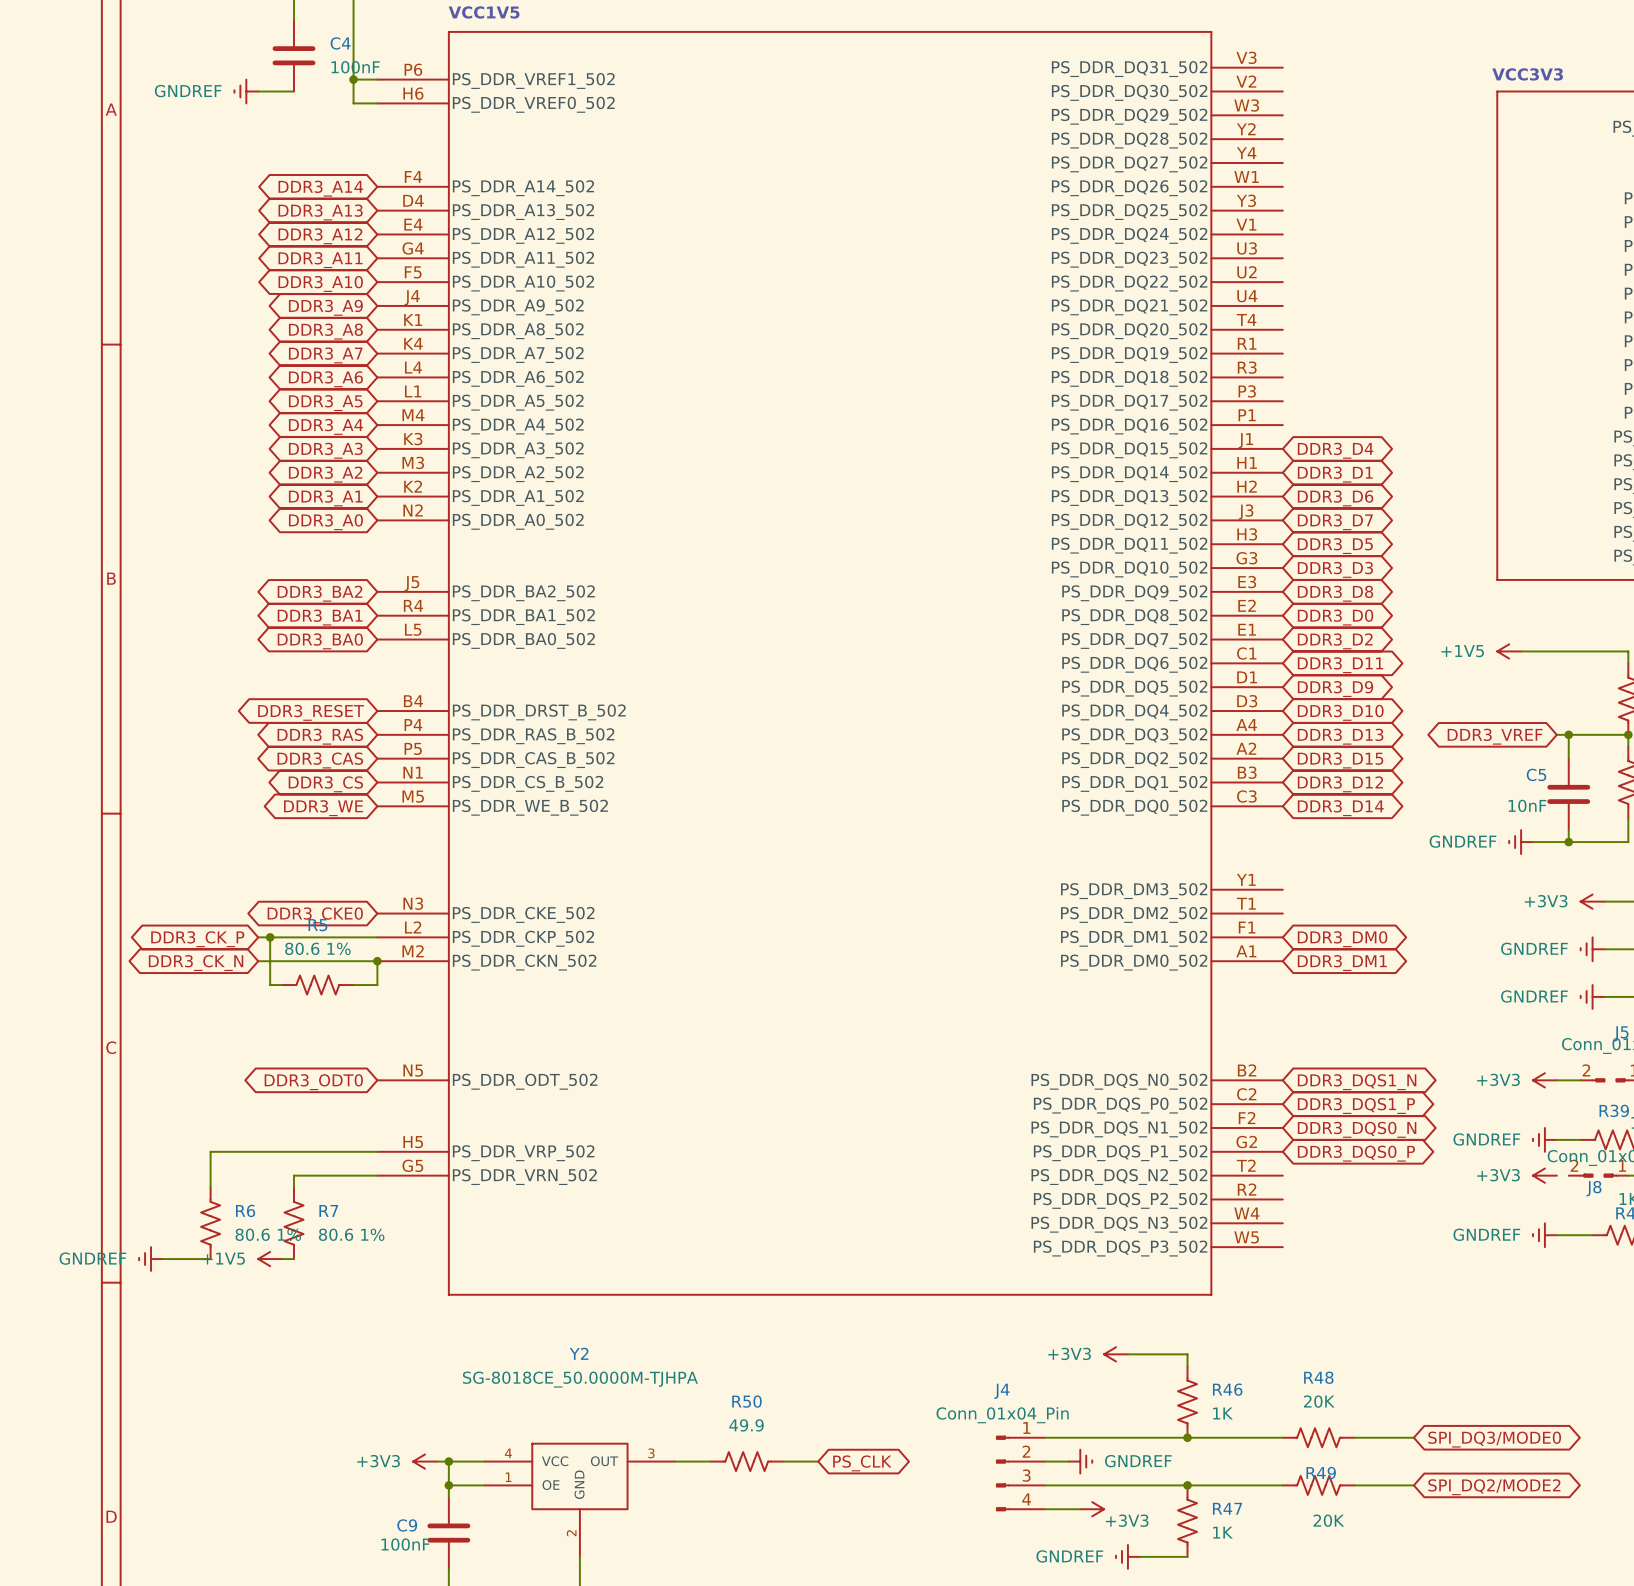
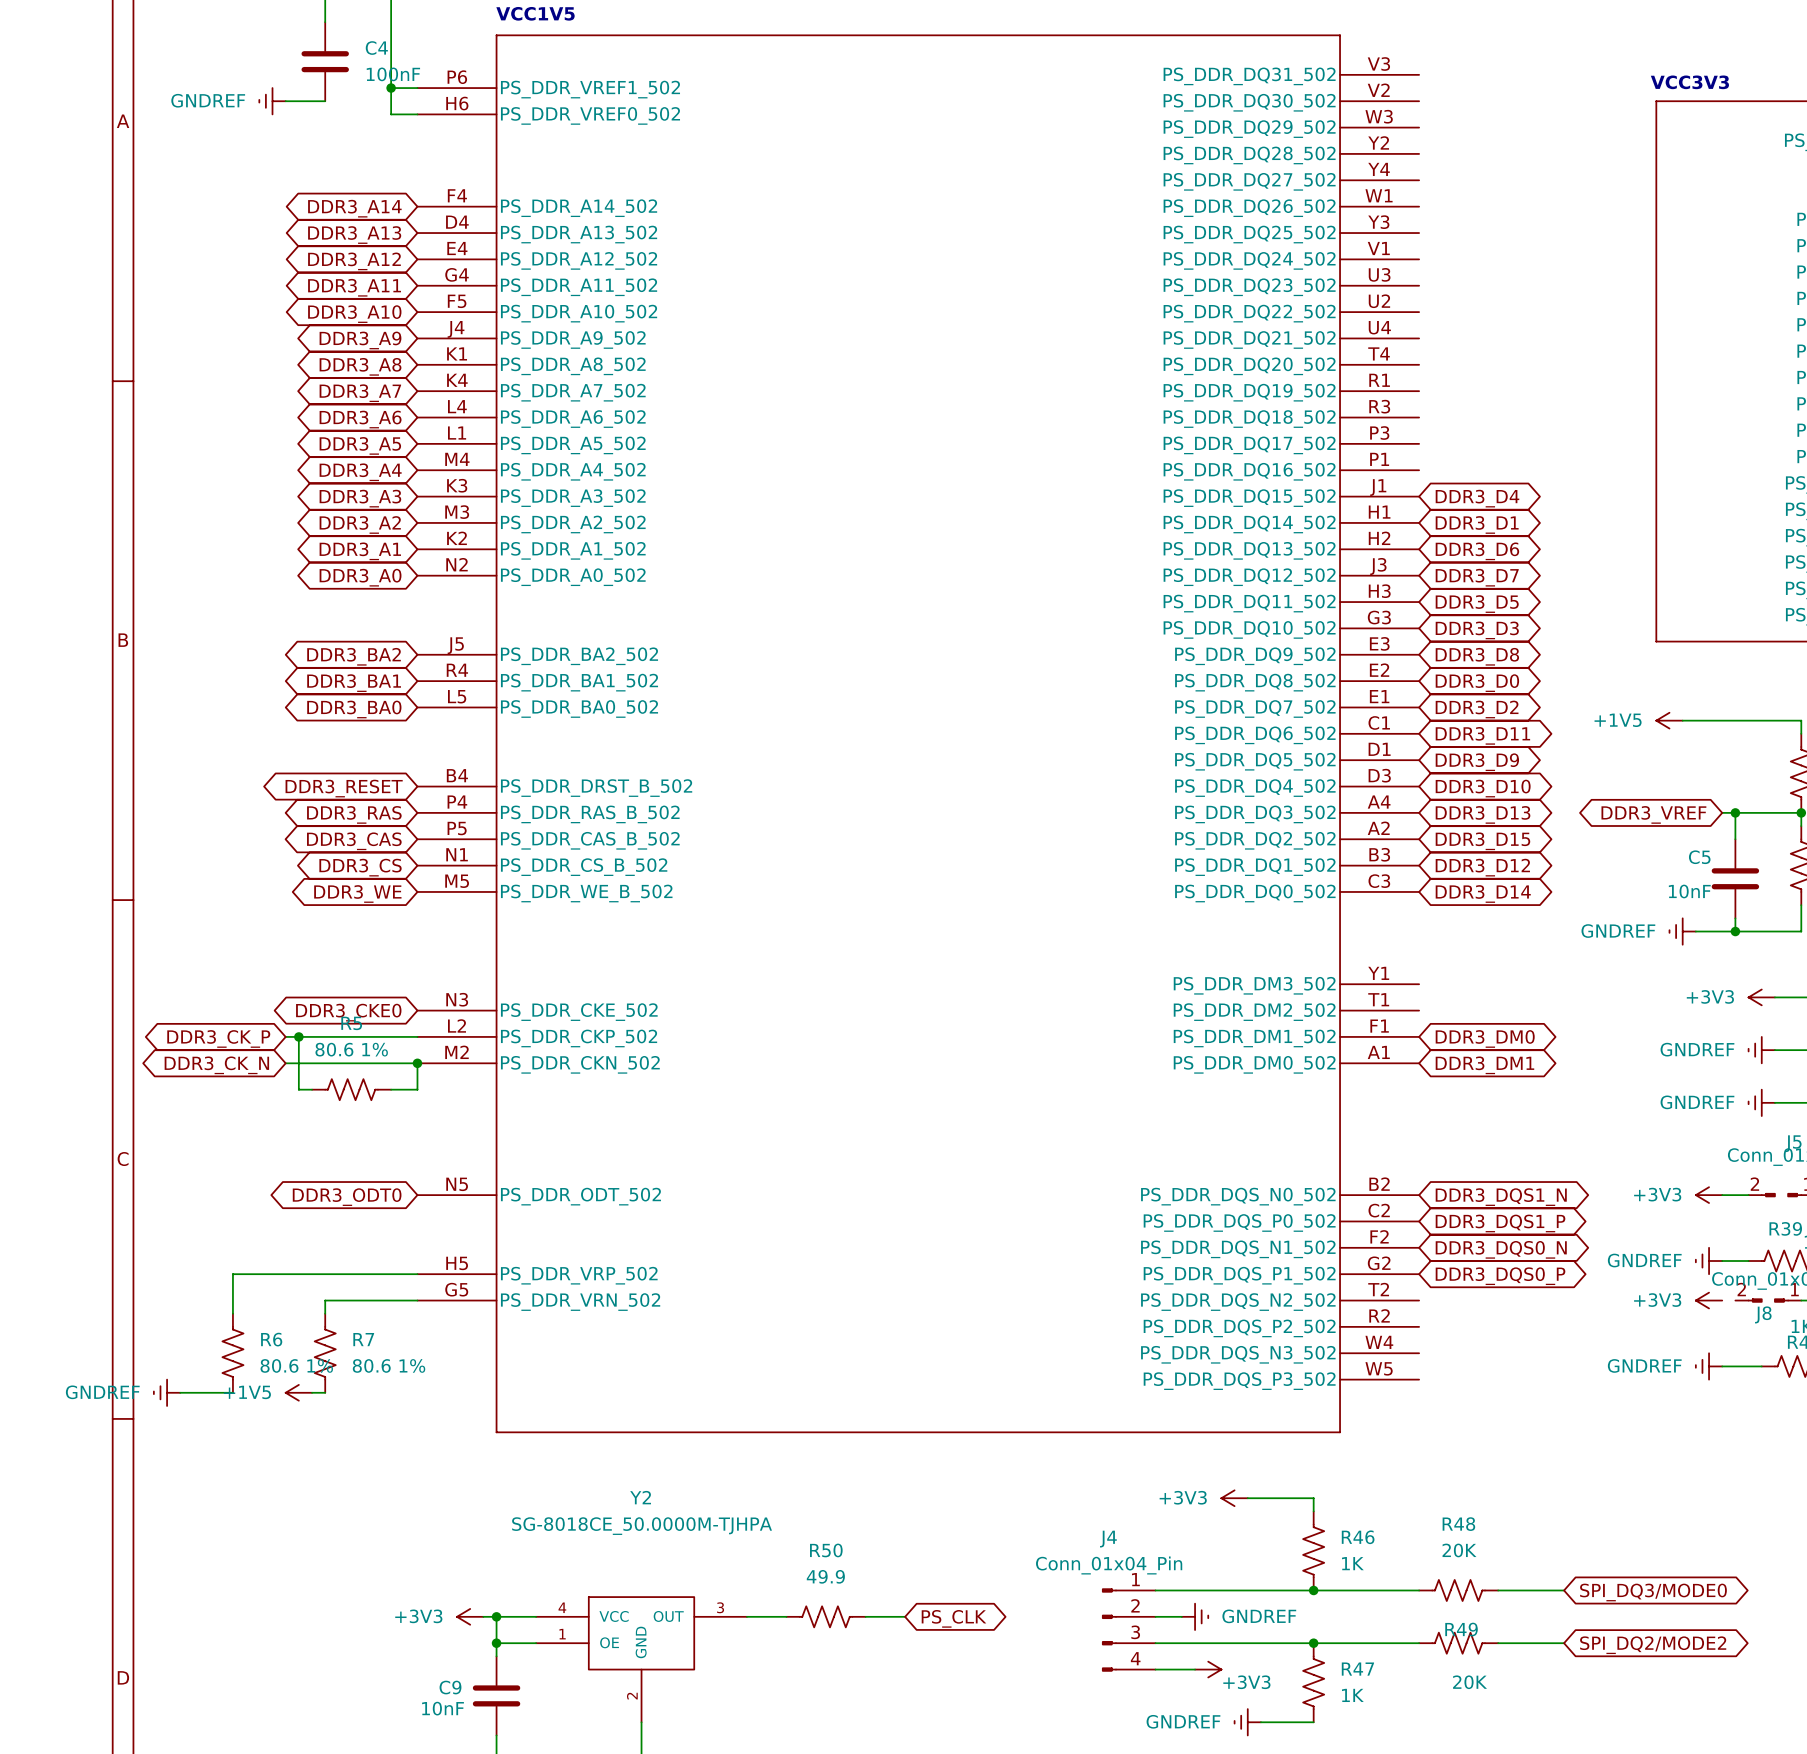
C9 value: 100nF (405, 1544) -> 10nF (443, 1708)

